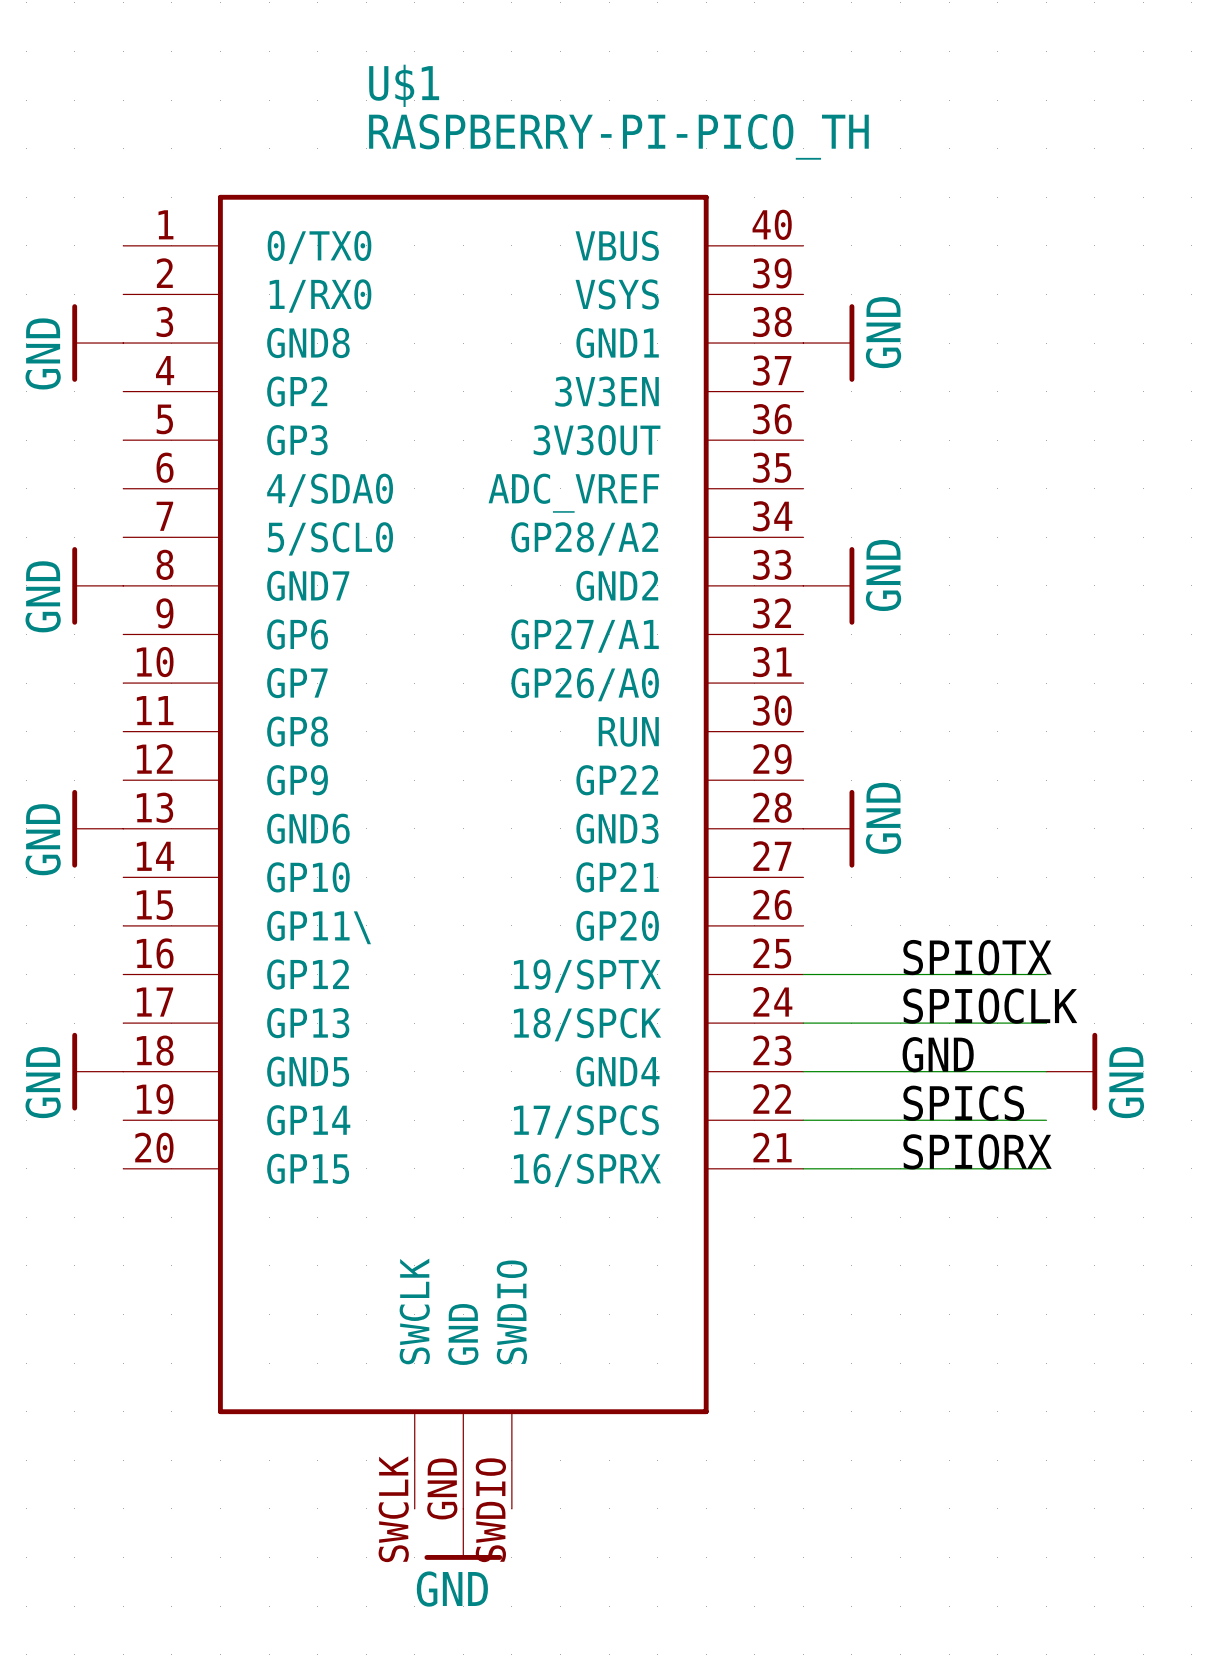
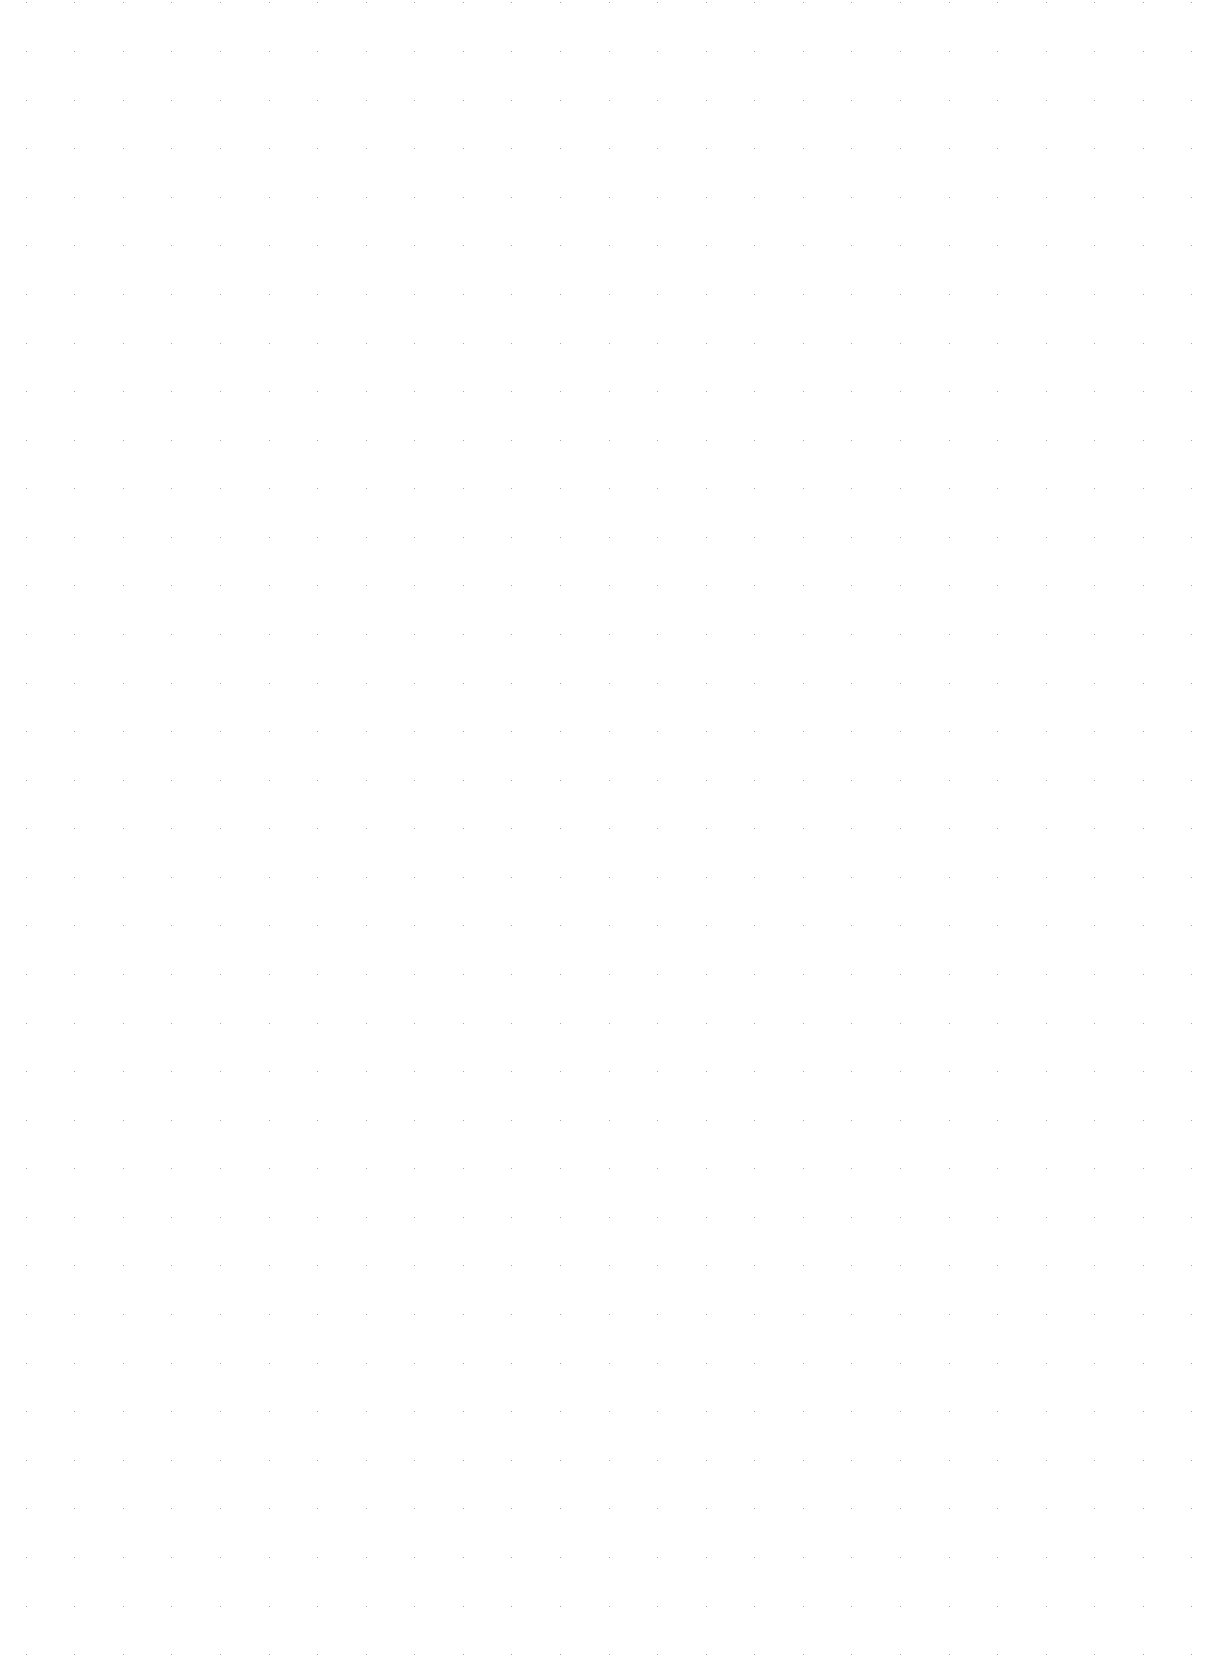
power symbol: GND (97, 343) -> none
power symbol: GND (828, 343) -> none
power symbol: GND (97, 585) -> none
power symbol: GND (828, 585) -> none
power symbol: GND (97, 828) -> none
power symbol: GND (828, 828) -> none
U$1: RASPBERRY-PI-PICO_TH (463, 851) -> none
label: SPIOTX (977, 957) -> none
wire: (803, 974) (1046, 974) -> none
label: SPIOCLK (990, 1006) -> none
wire: (803, 1023) (1046, 1023) -> none
label: GND (938, 1054) -> none
power symbol: GND (97, 1071) -> none
wire: (803, 1071) (1046, 1071) -> none
power symbol: GND (1071, 1071) -> none
label: SPICS (963, 1103) -> none
wire: (803, 1120) (1046, 1120) -> none
label: SPIORX (977, 1151) -> none
wire: (803, 1168) (1046, 1168) -> none
power symbol: GND (463, 1534) -> none

